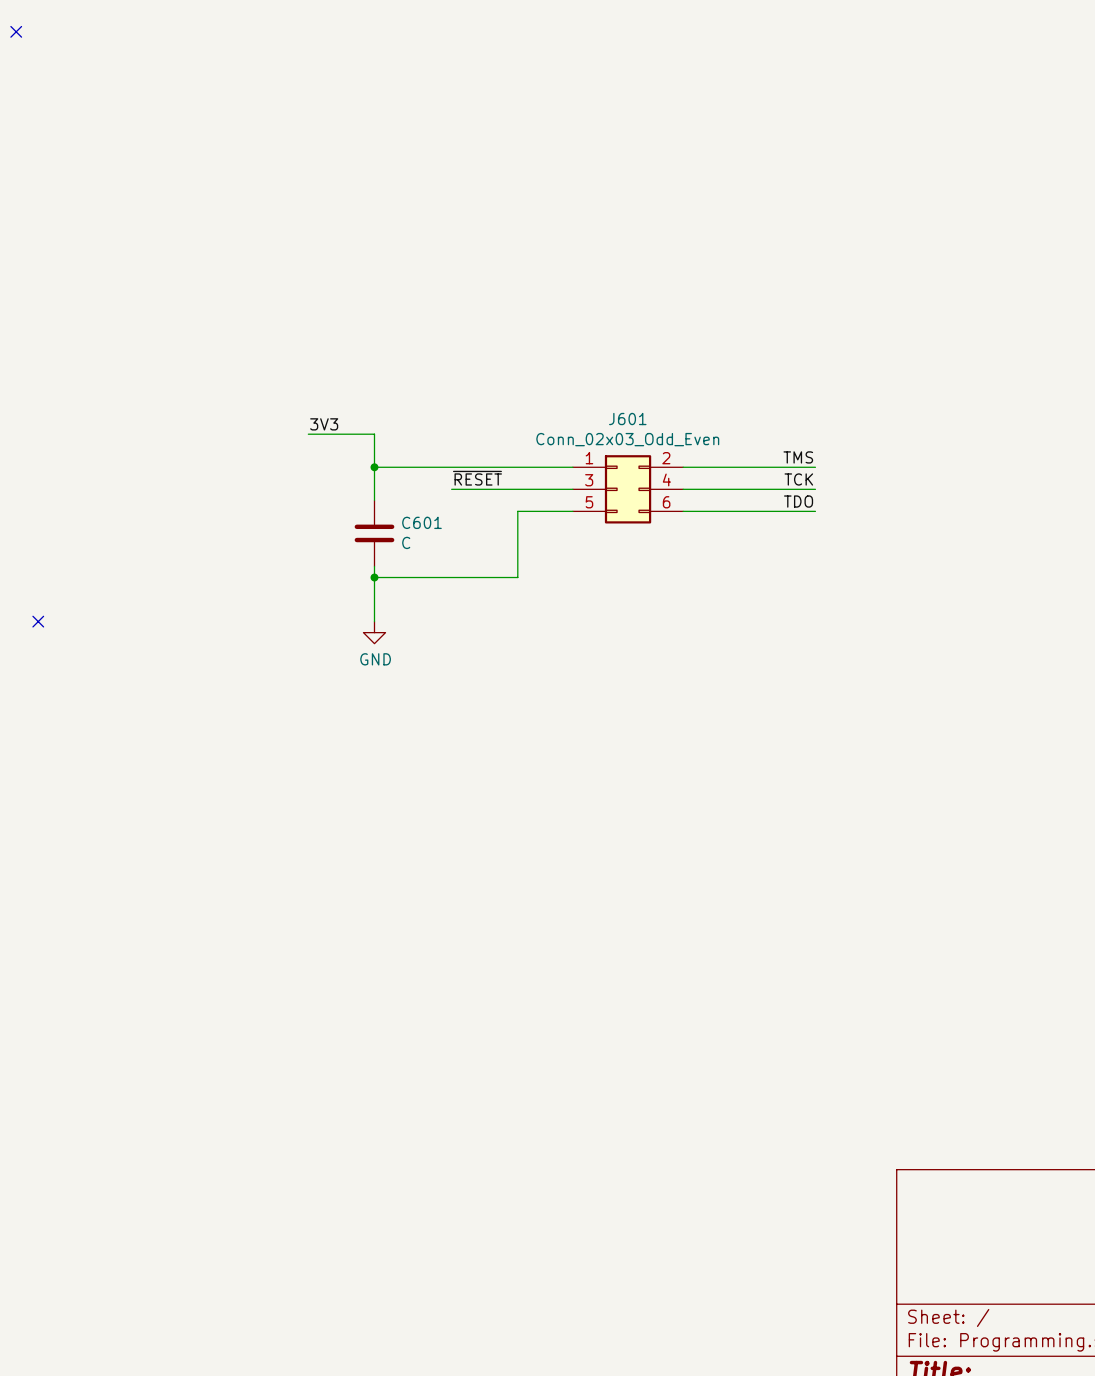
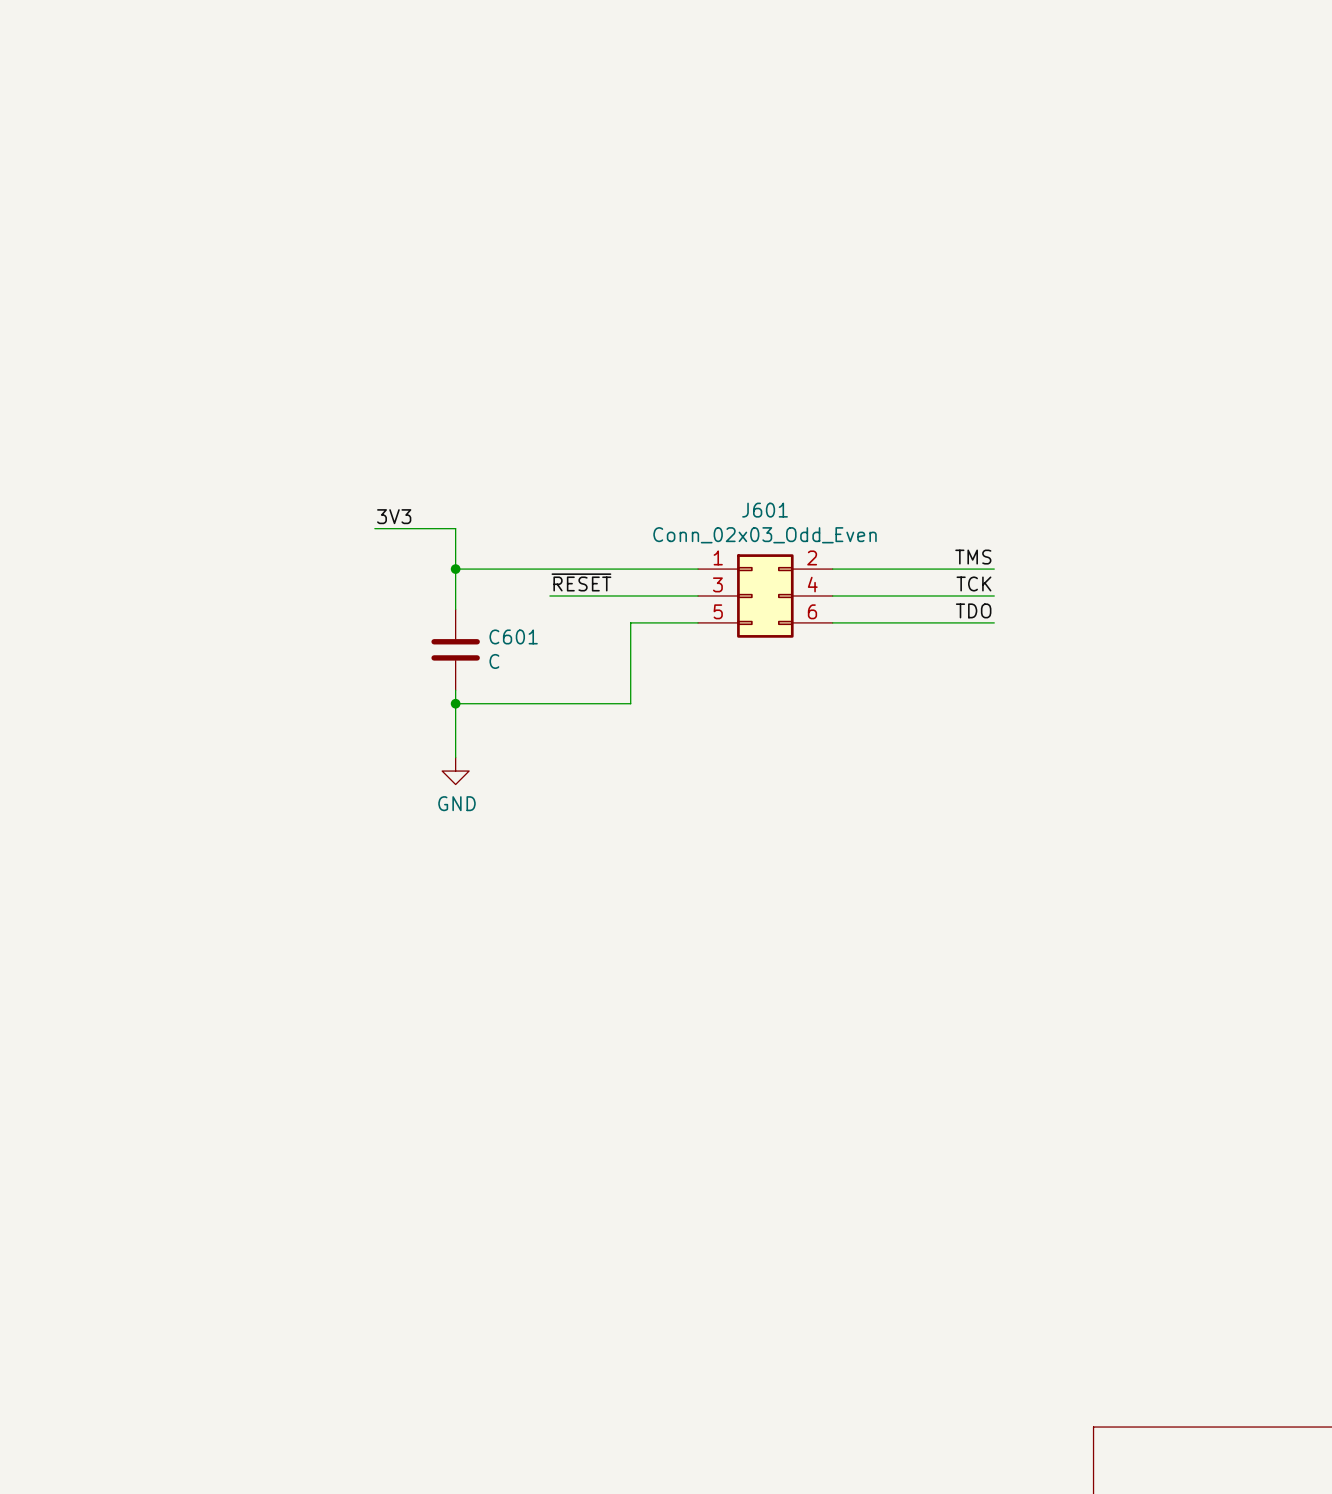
no-connect mark: (16, 31) -> none
no-connect mark: (38, 621) -> none

